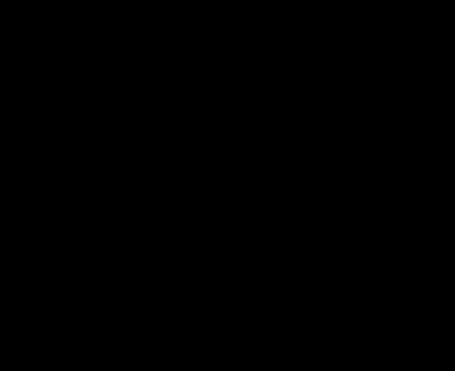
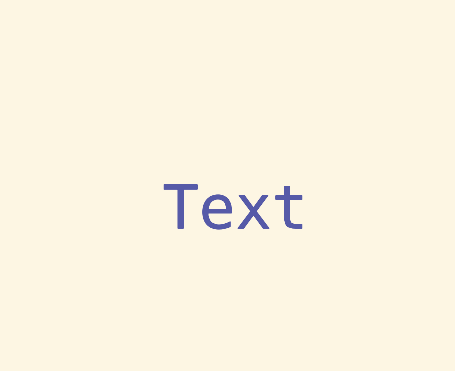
text: none -> Text (233, 206)

